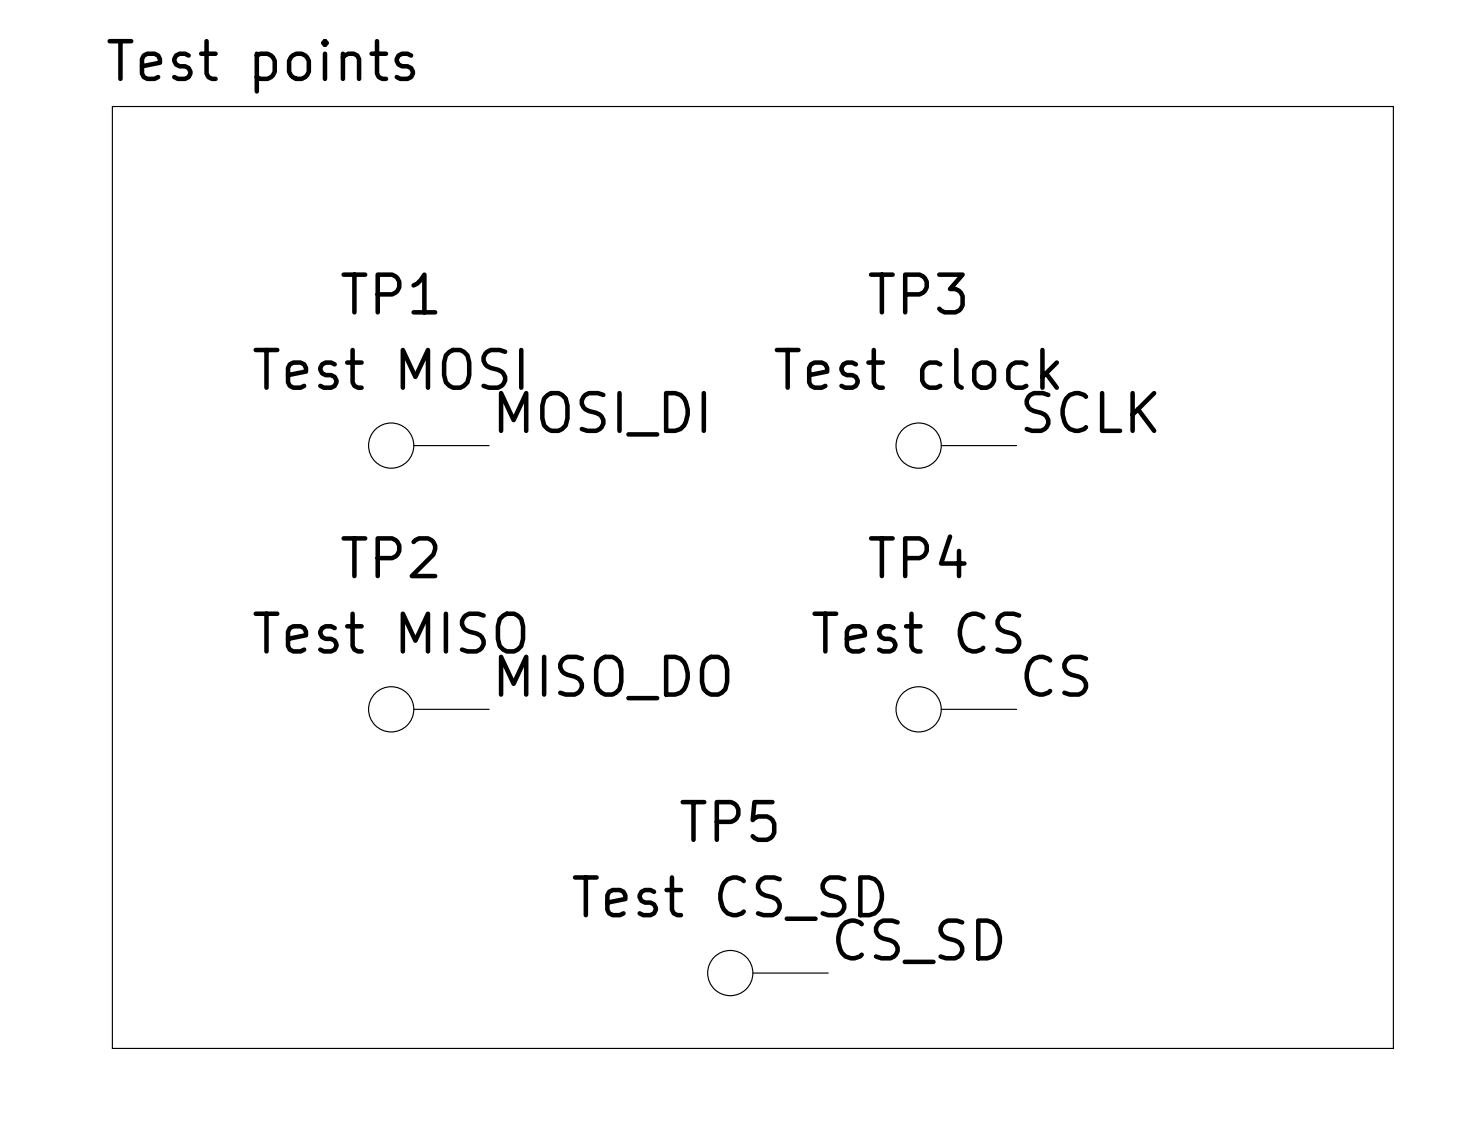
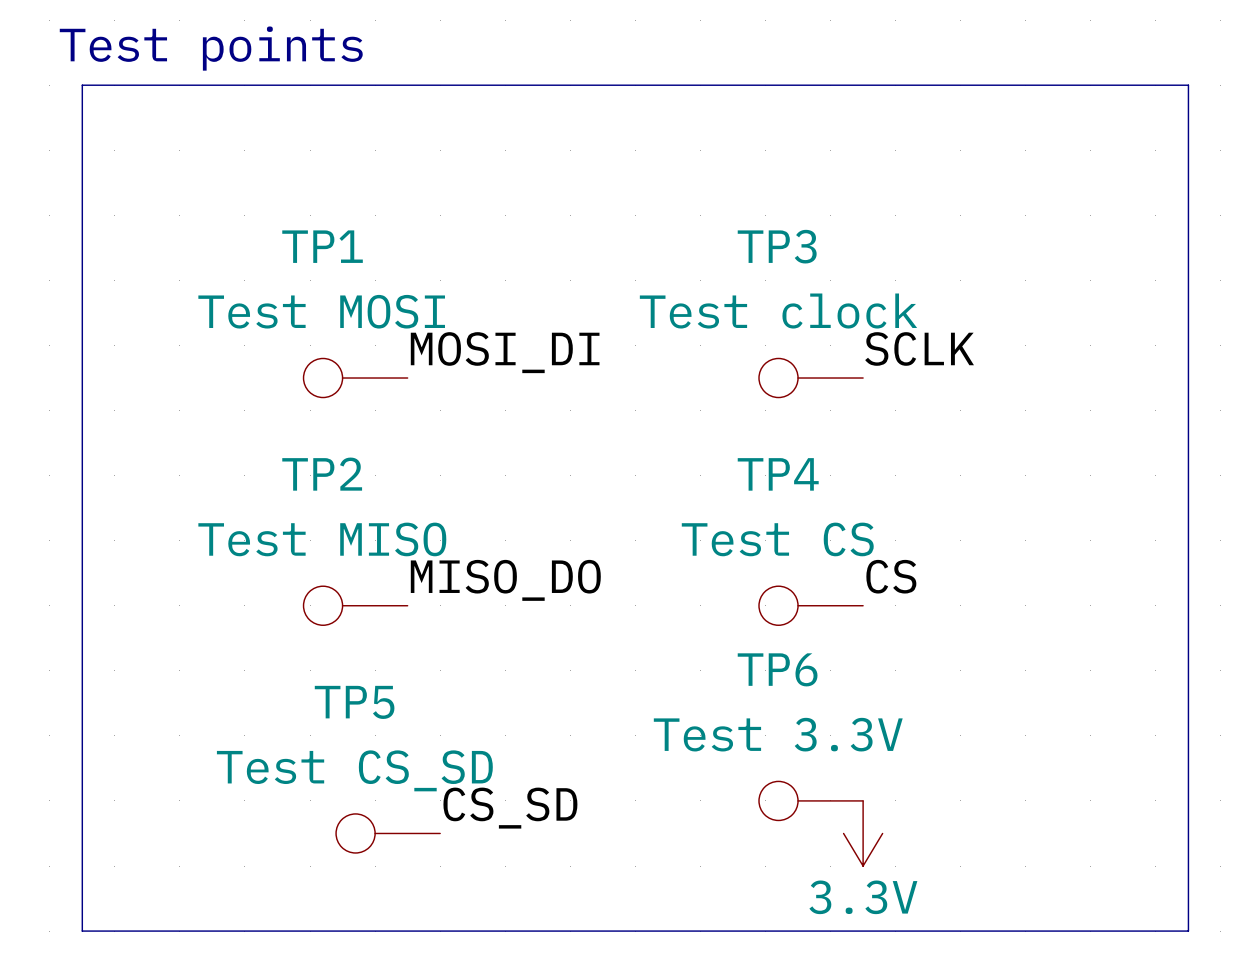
TP6: none -> Test 3.3V (811, 800)
label position: CS_SD (919, 941) -> CS_SD (510, 808)
TP5 position: (767, 973) -> (388, 833)
power symbol: none -> 3.3V (863, 833)
line: (112, 1048) (1393, 1048) -> (82, 898) (82, 931) (1188, 931) (1188, 898)

